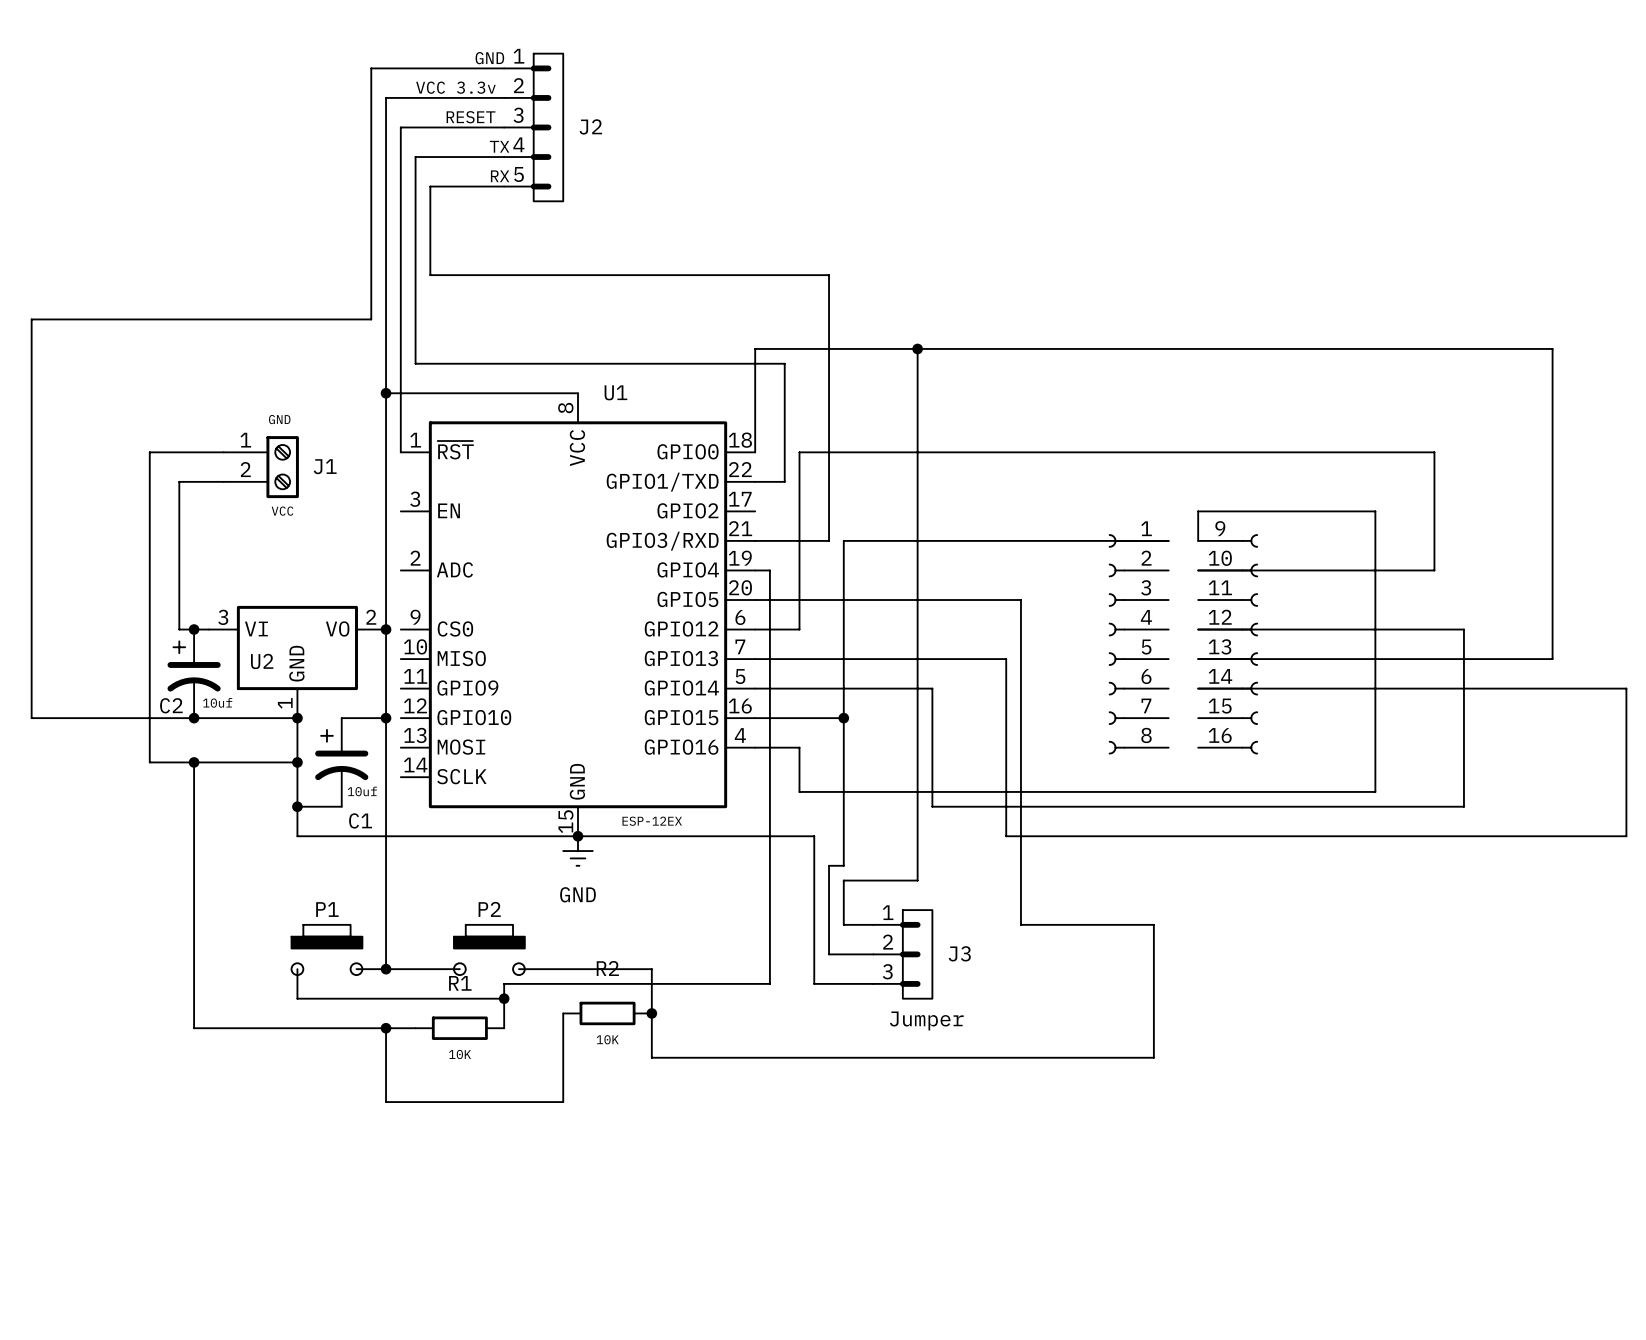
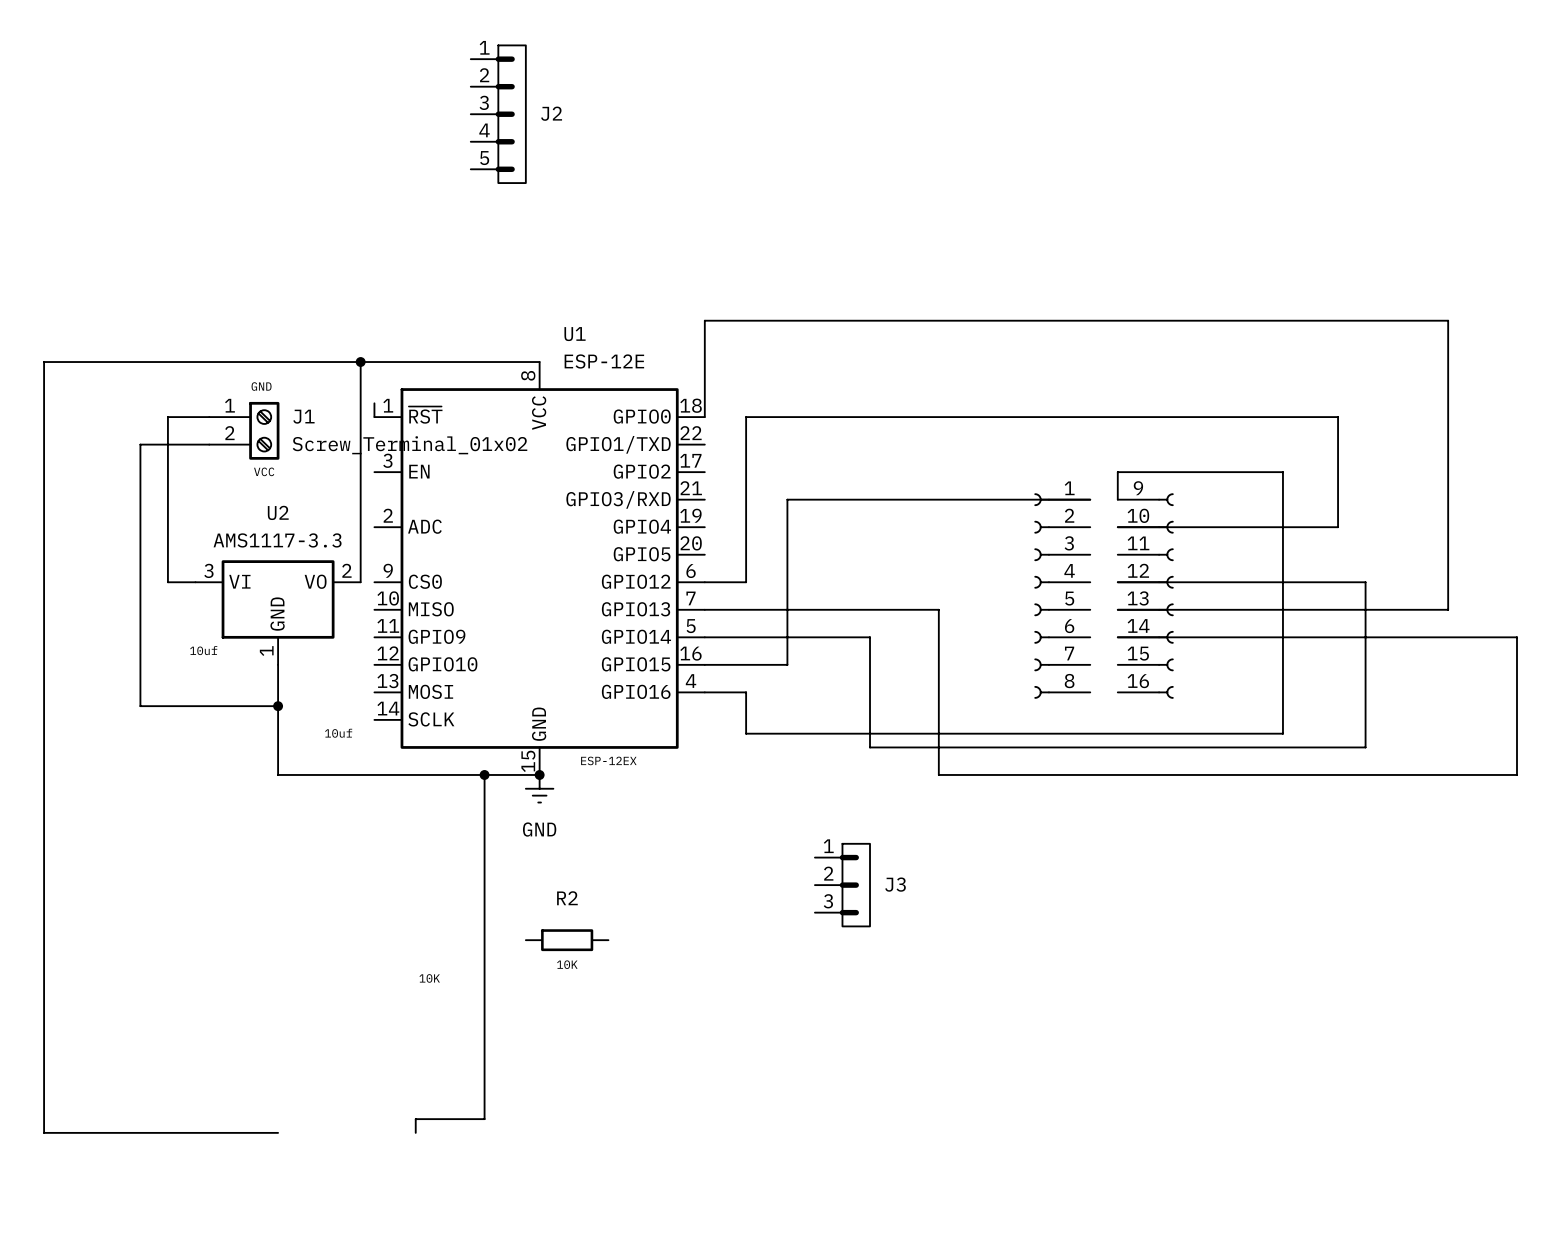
text: GND (489, 58) -> none
wire: (504, 68) (371, 68) (371, 319) (31, 319) (31, 718) (297, 718) -> none
text: VCC 3.3v (455, 87) -> none
wire: (504, 97) (386, 97) (386, 393) -> (278, 1132) (44, 1132) (44, 362) (360, 362)
text: RESET (471, 117) -> none
wire: (504, 127) (400, 127) (400, 437) -> none
text: TX (499, 146) -> none
wire: (504, 157) (415, 157) (415, 363) (784, 363) (784, 481) (755, 481) -> none
text: RX (500, 176) -> none
wire: (504, 186) (430, 186) (430, 275) (829, 275) (829, 540) (755, 540) -> none
wire: (917, 348) (917, 880) (843, 880) (843, 924) (873, 924) -> none
junction: (917, 348) -> none
U1 name position: U1 (615, 392) -> U1 (575, 334)
U1 value: none -> ESP-12E (604, 361)
wire: (179, 452) (149, 452) (149, 481) -> (167, 417) (167, 444) (140, 444)
J1 name position: J1 (325, 466) -> J1 (303, 416)
J1 value: none -> Screw_Terminal_01x02 (410, 445)
wire: (755, 570) (769, 570) (769, 983) (504, 983) (504, 1028) -> none
U2 value: none -> AMS1117-3.3 (277, 540)
wire: (755, 600) (1020, 600) (1020, 924) (1153, 924) (1153, 1057) (651, 1057) (651, 969) (518, 969) -> none
junction: (194, 629) -> none
wire: (386, 629) (386, 969) -> none
junction: (386, 629) -> none
U2 name position: U2 (262, 661) -> U2 (278, 512)
C2: (194, 673) -> none
junction: (194, 718) -> none
junction: (297, 718) -> none
wire: (341, 718) (386, 718) -> none
junction: (386, 718) -> none
wire: (843, 718) (843, 865) (829, 865) (829, 954) (873, 954) -> none
junction: (843, 718) -> none
wire: (194, 762) (194, 1028) (415, 1028) -> none
junction: (194, 762) -> none
C1: (341, 762) -> none
wire: (297, 806) (341, 806) -> none
junction: (297, 806) -> none
wire: none -> (484, 774) (484, 1119) (415, 1119) (415, 1132)
junction: none -> (484, 774)
wire: (578, 836) (814, 836) (814, 983) (873, 983) -> none
P1: (326, 949) -> none
P2: (489, 949) -> none
wire: (297, 969) (297, 998) (504, 998) -> none
wire: (356, 969) (459, 969) -> none
junction: (386, 969) -> none
junction: (504, 998) -> none
wire: (563, 1013) (563, 1102) (386, 1102) (386, 1028) -> none
junction: (651, 1013) -> none
text: Jumper (926, 1020) -> none
junction: (386, 1028) -> none
R1: (459, 1028) -> none

